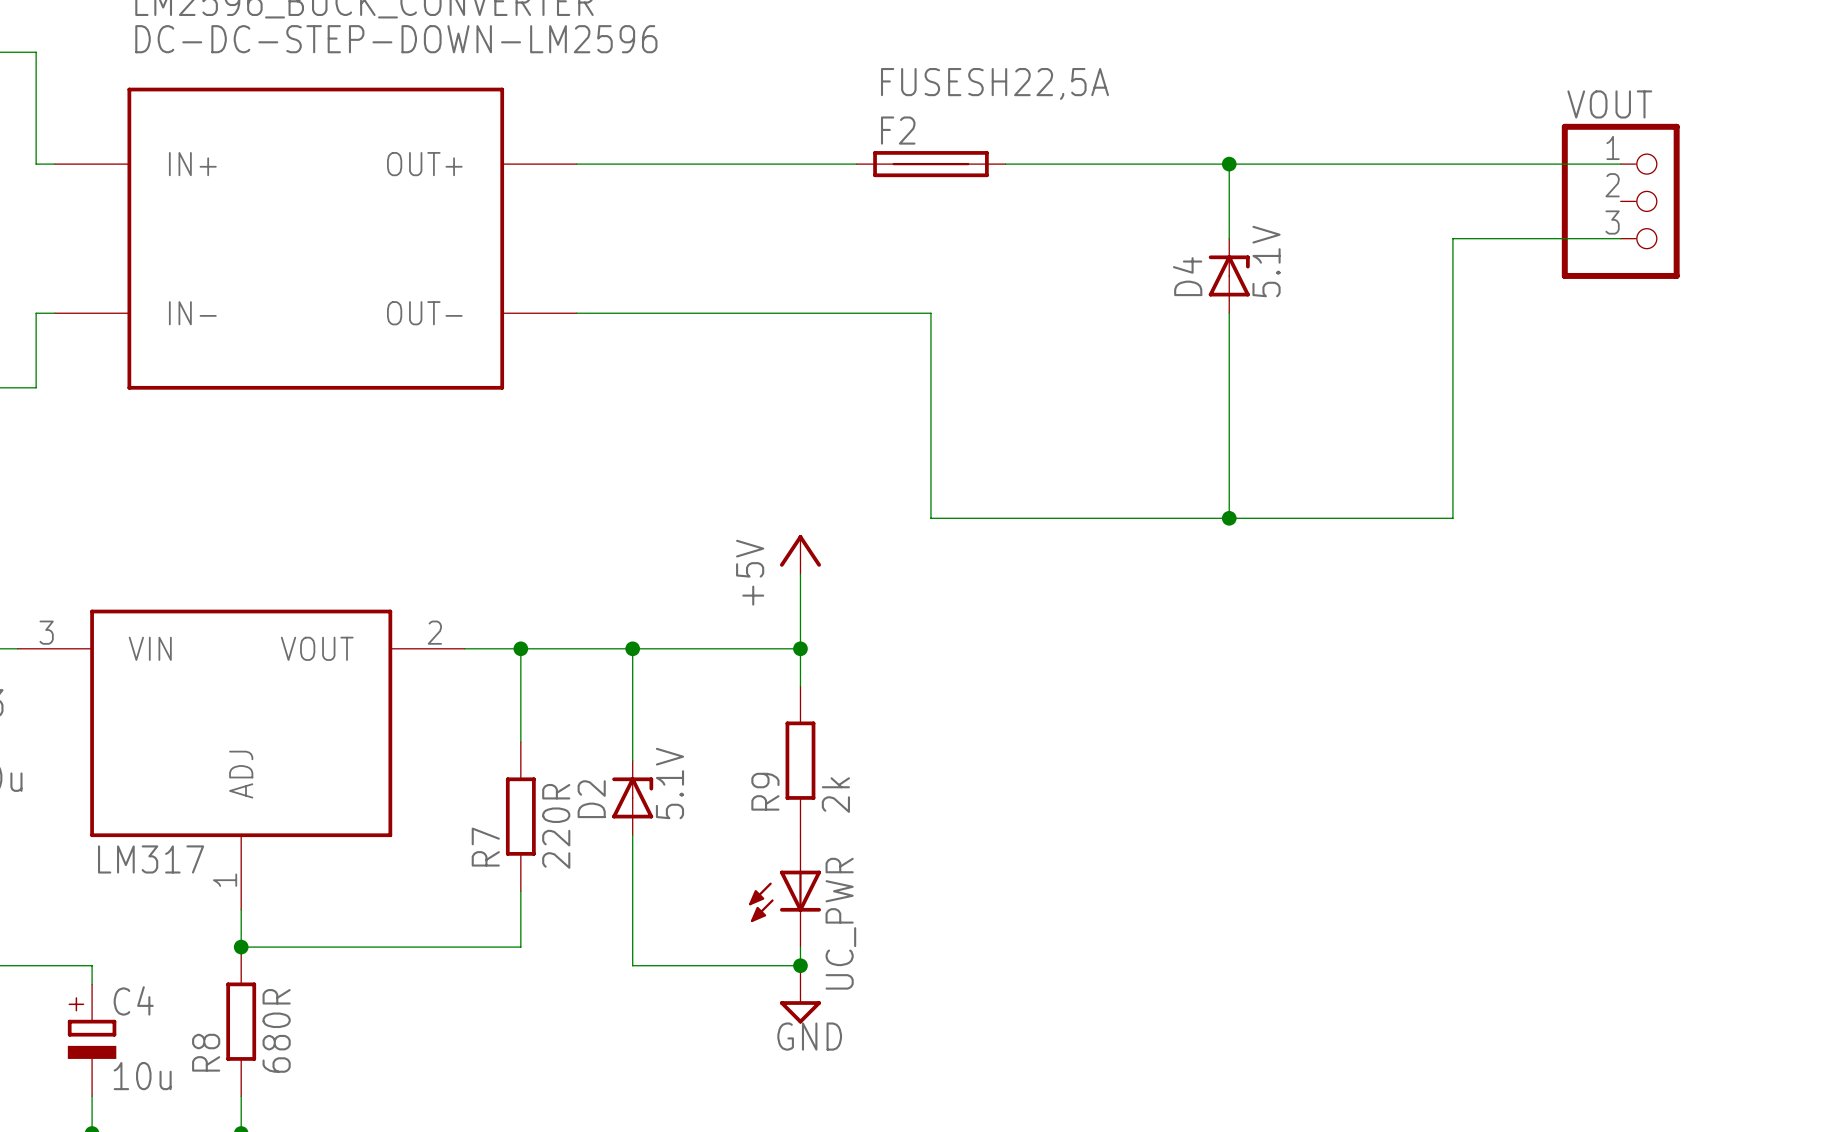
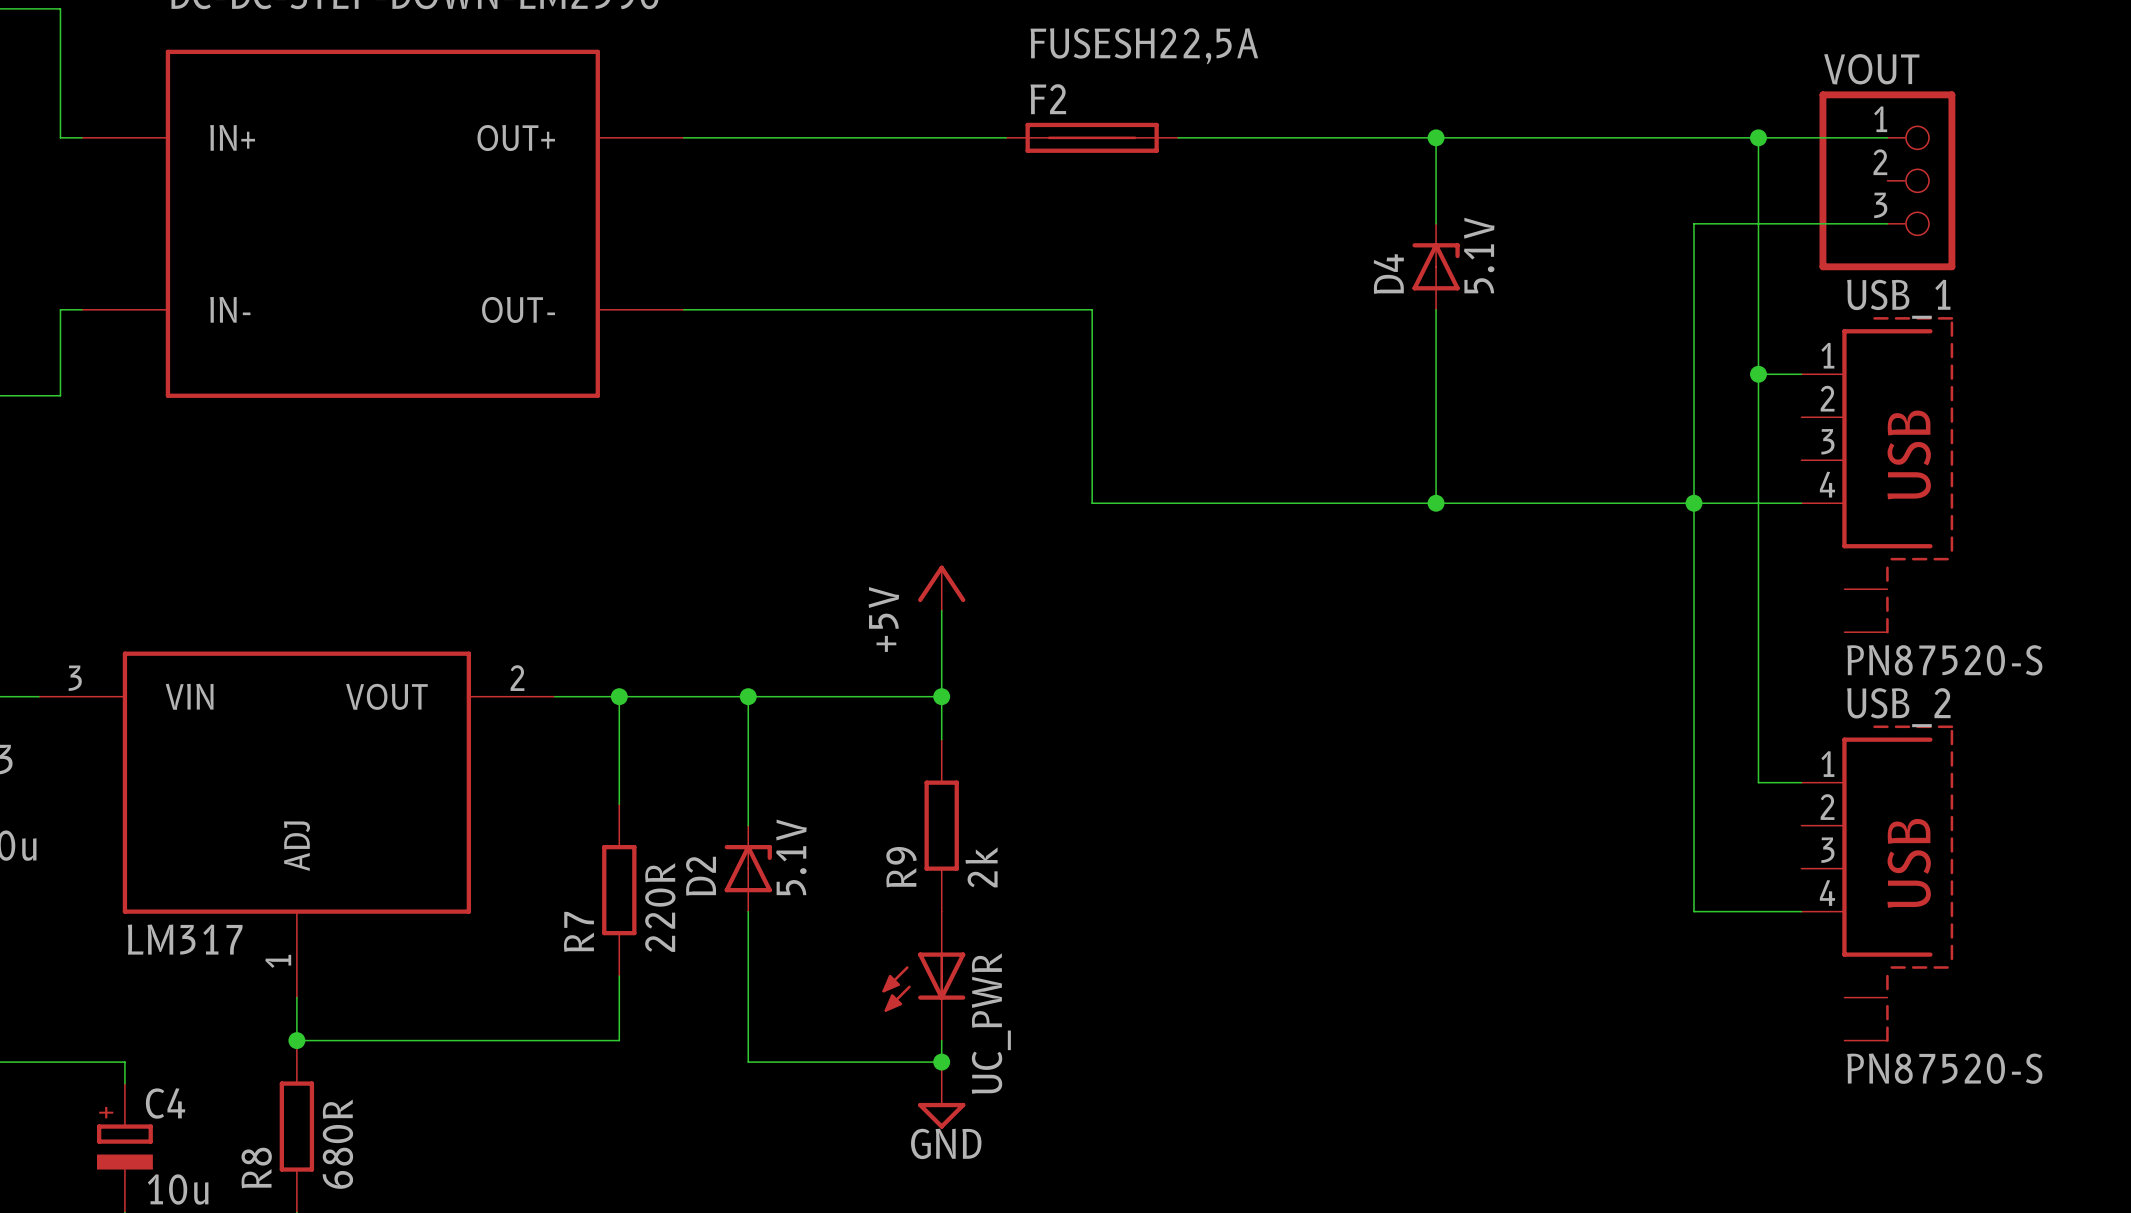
wire: none -> (1758, 137) (1758, 782) (1801, 782)
junction: none -> (1758, 137)
wire: none -> (1758, 374) (1801, 374)
junction: none -> (1758, 374)
USB_1: none -> PN87520-S (1877, 475)
wire: (930, 481) (930, 518) (1452, 518) -> (1092, 503) (1801, 503)
wire: (1229, 481) (1229, 518) -> none
junction: none -> (1693, 503)
junction position: (1229, 518) -> (1436, 503)
wire: none -> (1693, 546) (1693, 911) (1801, 911)
USB_2: none -> PN87520-S (1877, 883)

